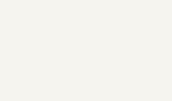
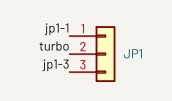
label: none -> jp1-1 (56, 29)
label: none -> turbo (54, 46)
JP1: none -> (92, 54)
label: none -> jp1-3 (55, 65)

